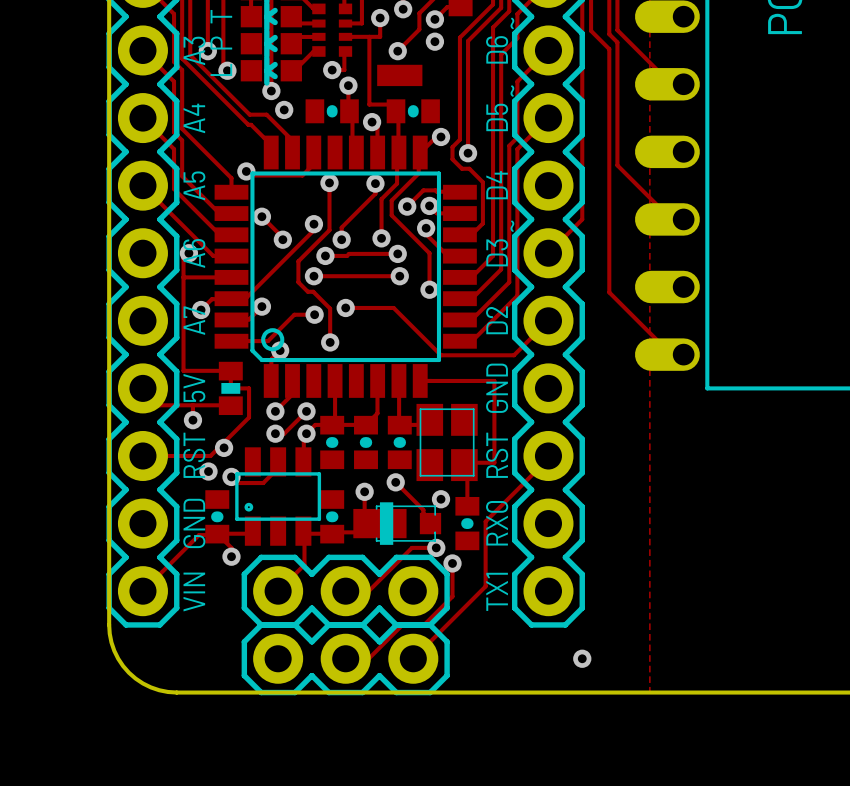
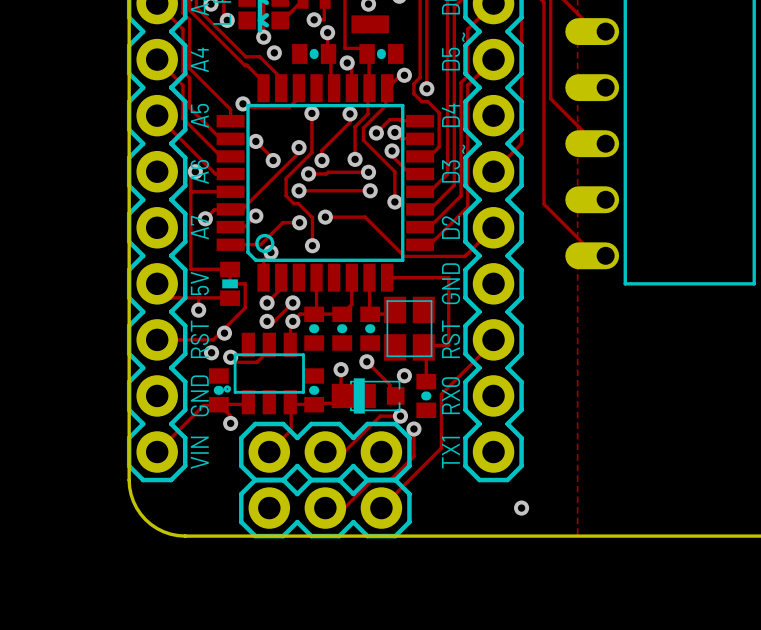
part footprint: [235, 447, 322, 546] -> [223, 332, 305, 415]

